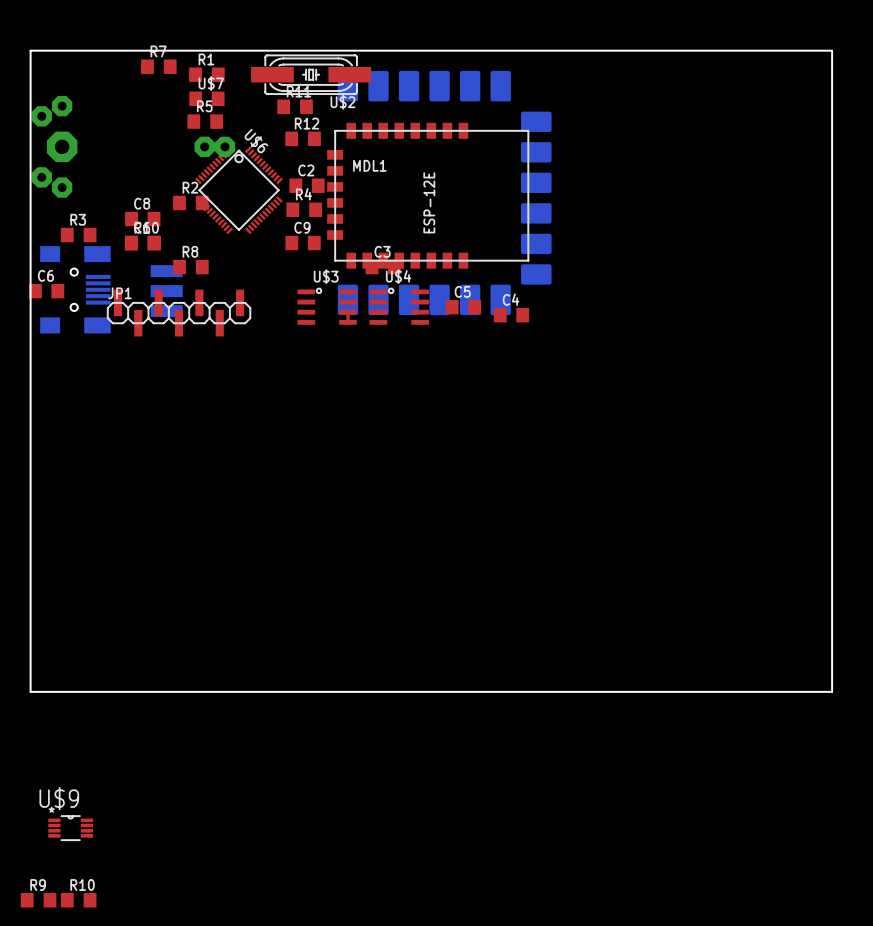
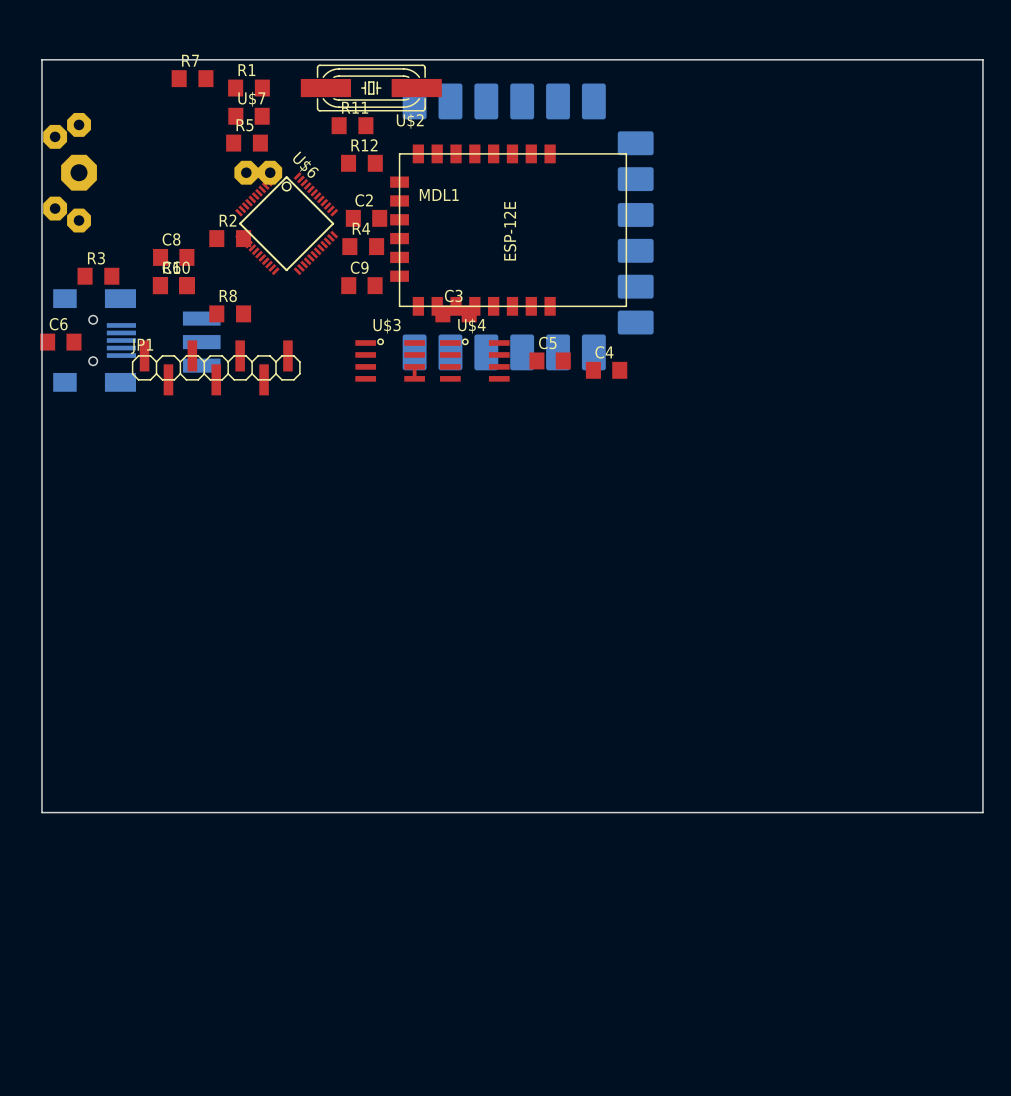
U$9: (70, 828) -> none
R9: (38, 900) -> none
R10: (78, 900) -> none

